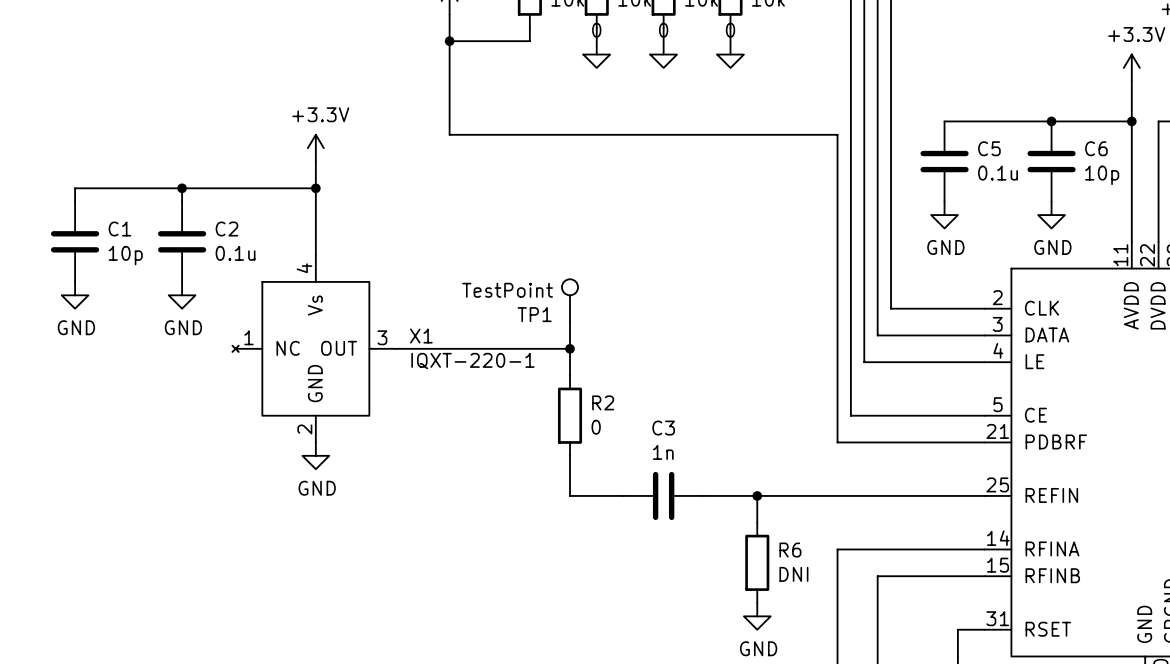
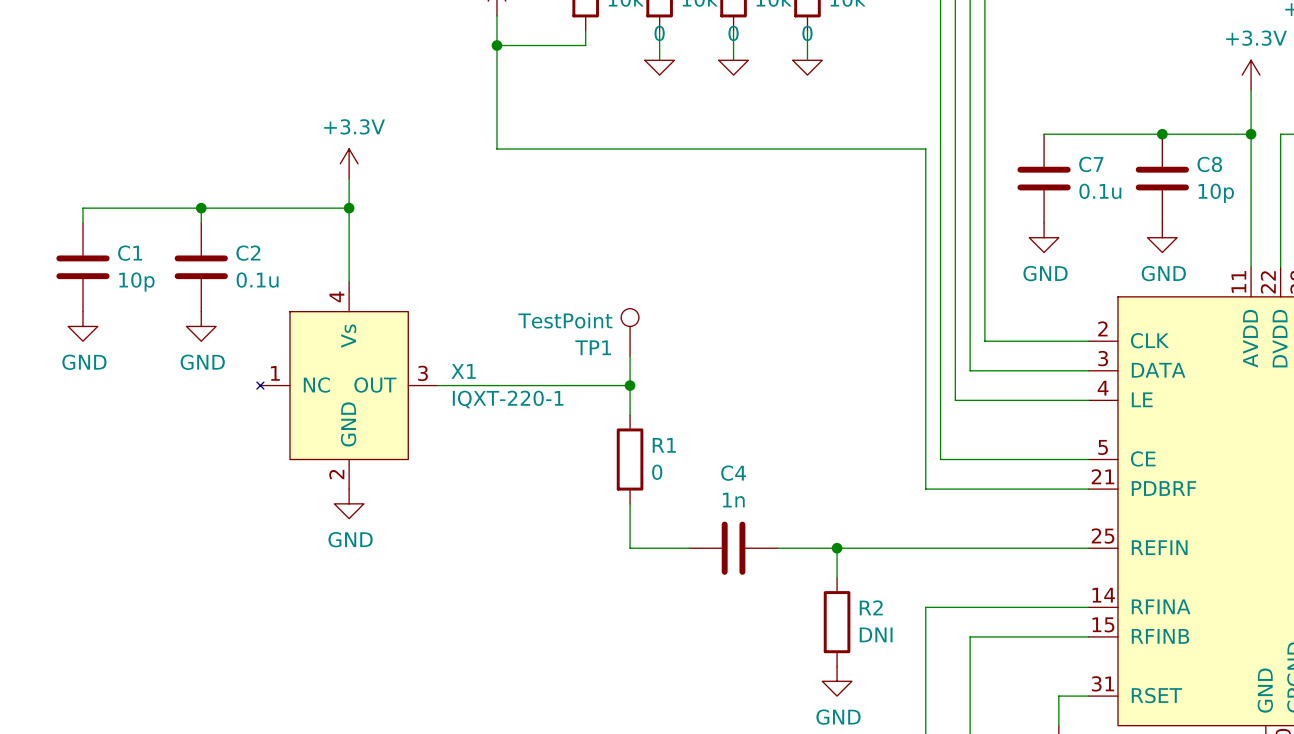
C5 name: C5 (989, 148) -> C7 (1091, 164)
C6 name: C6 (1096, 148) -> C8 (1209, 164)
R2 name: R2 (603, 402) -> R1 (664, 445)
C3 name: C3 (663, 428) -> C4 (733, 473)
R6 name: R6 (790, 550) -> R2 (871, 607)

